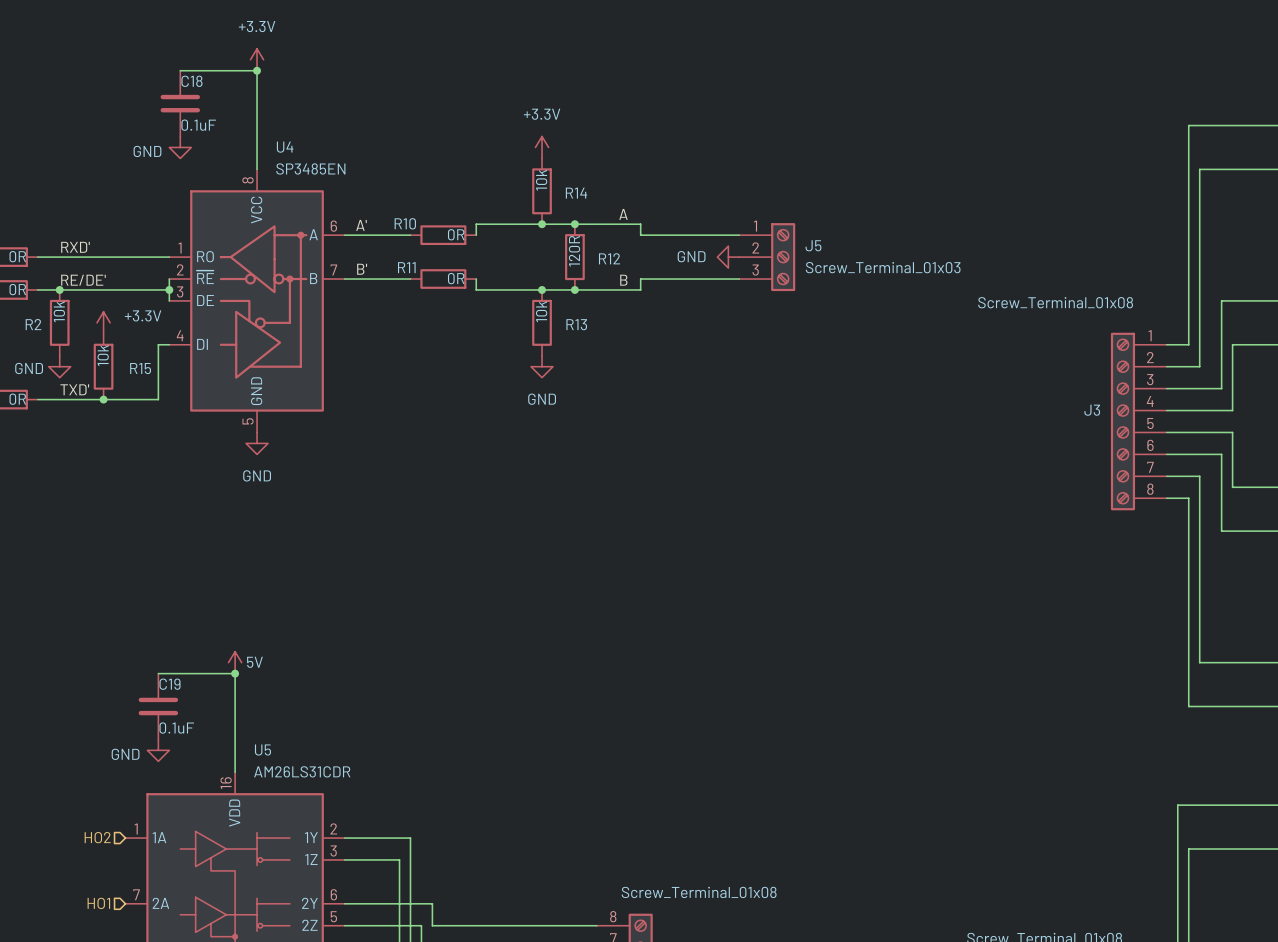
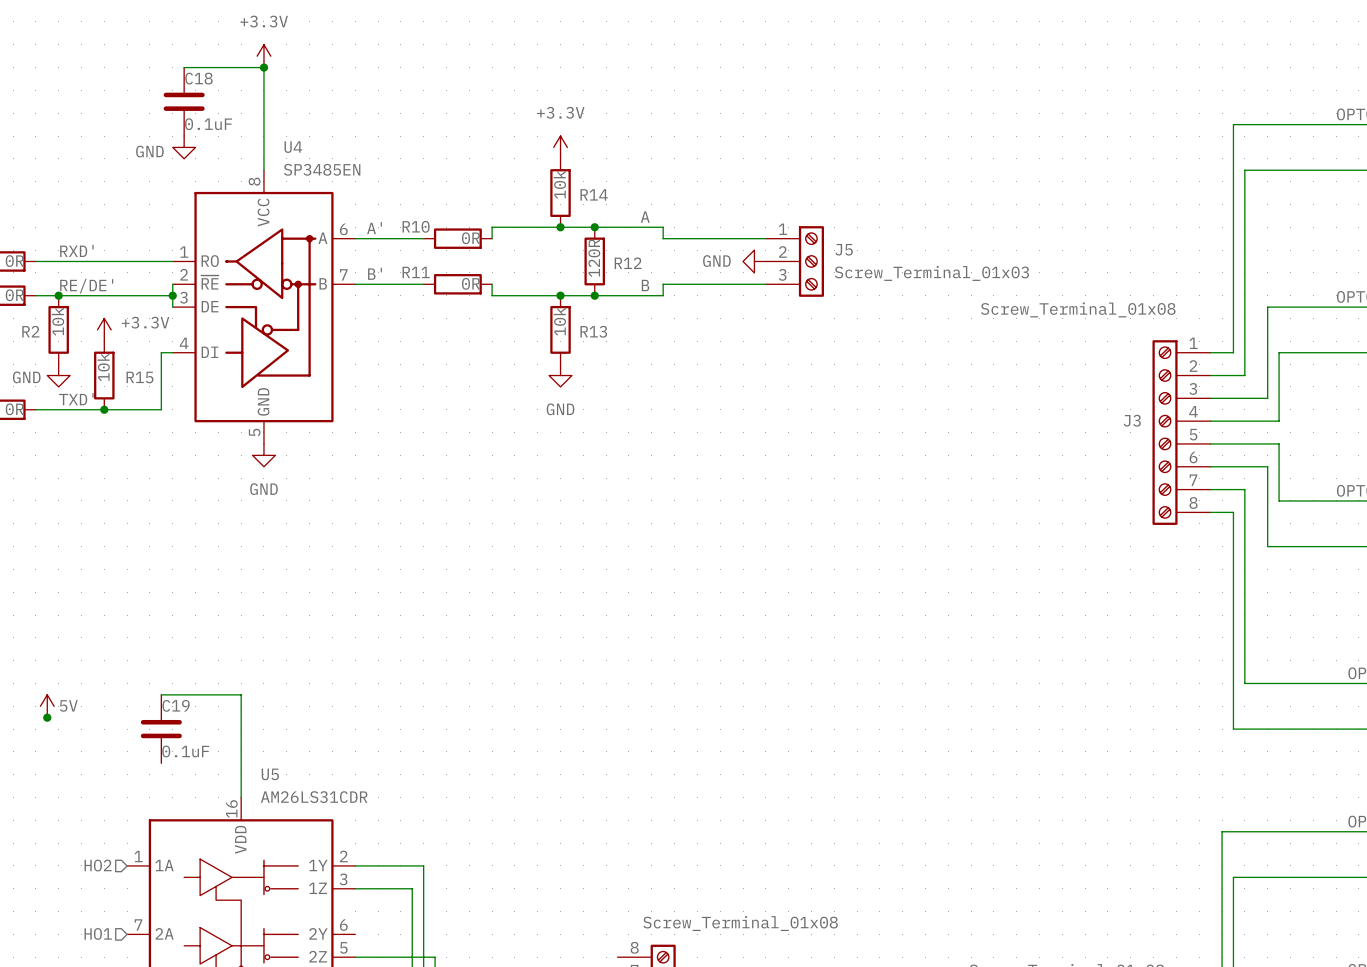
power symbol position: 5V (235, 662) -> 5V (47, 706)
junction: (235, 673) -> none
junction: none -> (47, 717)
power symbol: GND (158, 750) -> none
wire: (344, 903) (432, 903) (432, 925) (596, 925) -> none

